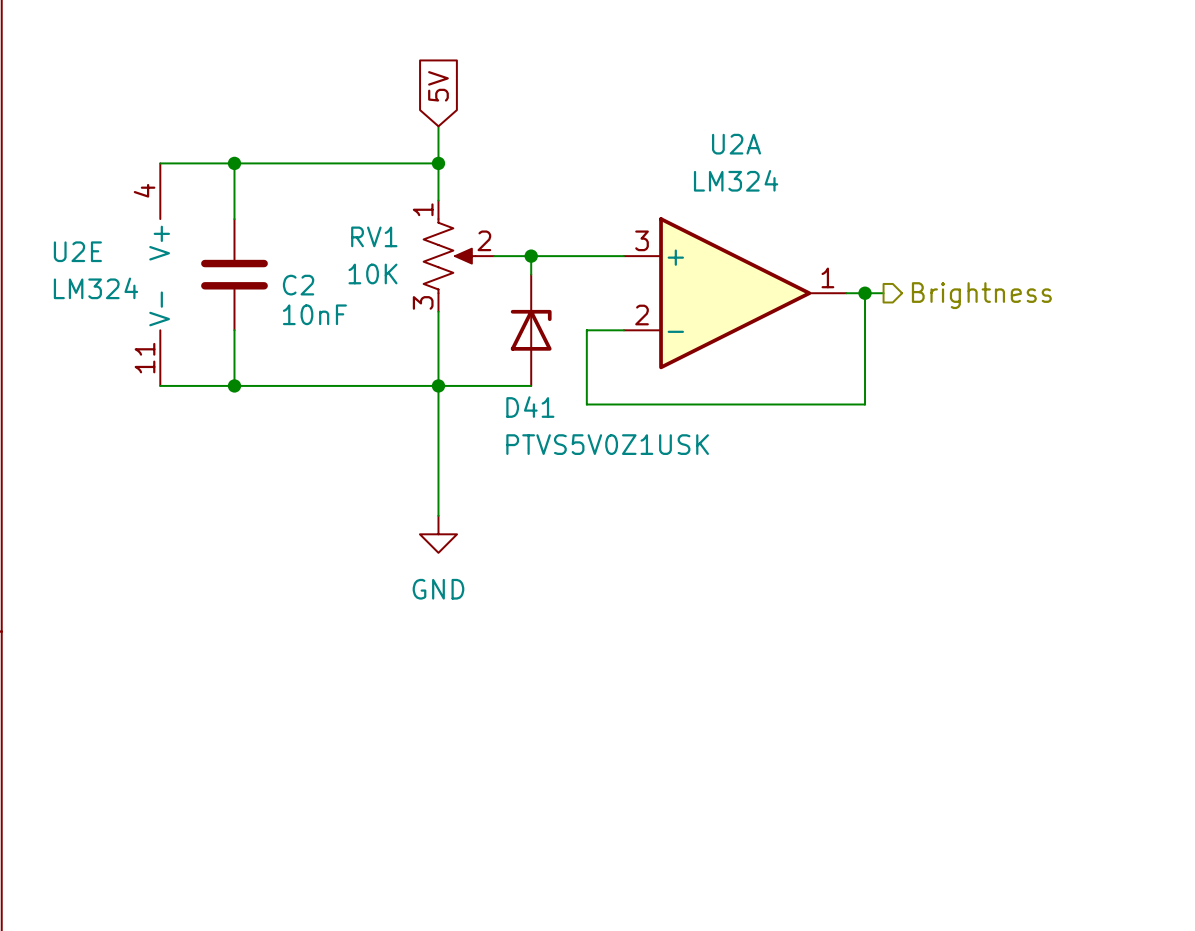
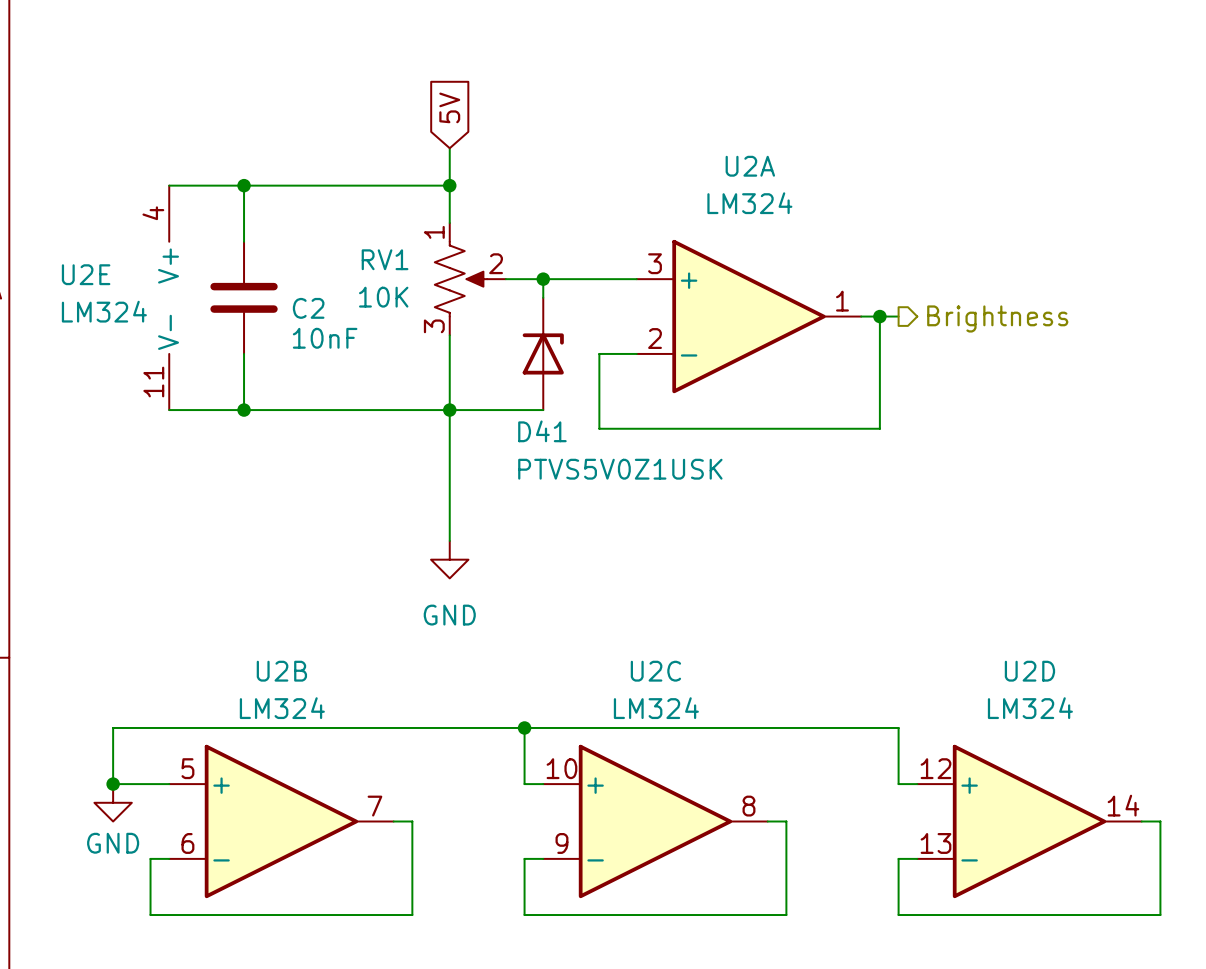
wire: none -> (524, 727) (524, 784) (543, 784)
junction: none -> (524, 727)
junction: none -> (113, 784)
wire: none -> (169, 784) (113, 784) (113, 727) (898, 727) (898, 784) (917, 784)
power symbol: none -> GND (113, 802)
U2B: none -> LM324 (281, 821)
wire: none -> (393, 821) (412, 821) (412, 915) (150, 915) (150, 858) (169, 858)
U2C: none -> LM324 (655, 821)
wire: none -> (767, 821) (786, 821) (786, 915) (524, 915) (524, 858) (543, 858)
U2D: none -> LM324 (1029, 821)
wire: none -> (1141, 821) (1160, 821) (1160, 915) (898, 915) (898, 858) (917, 858)

